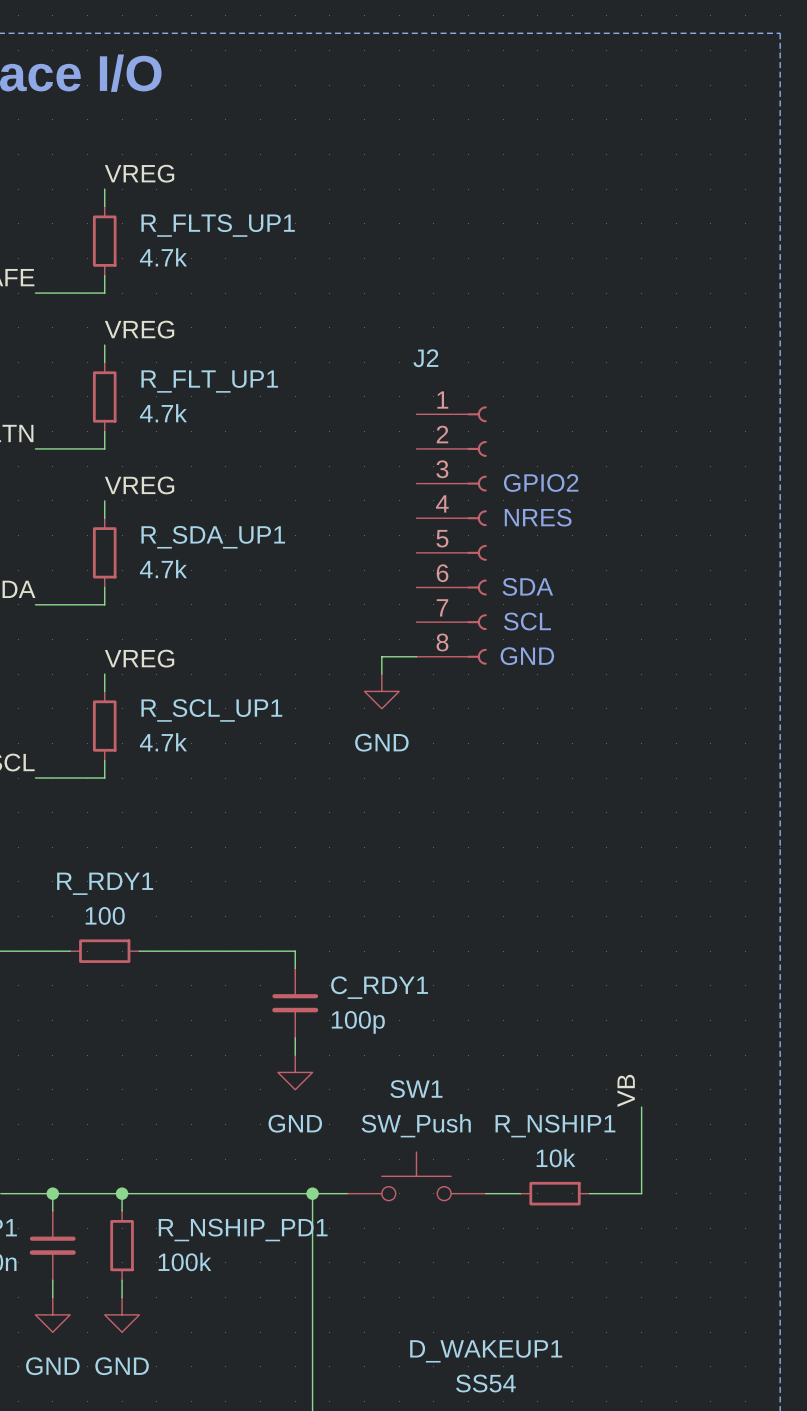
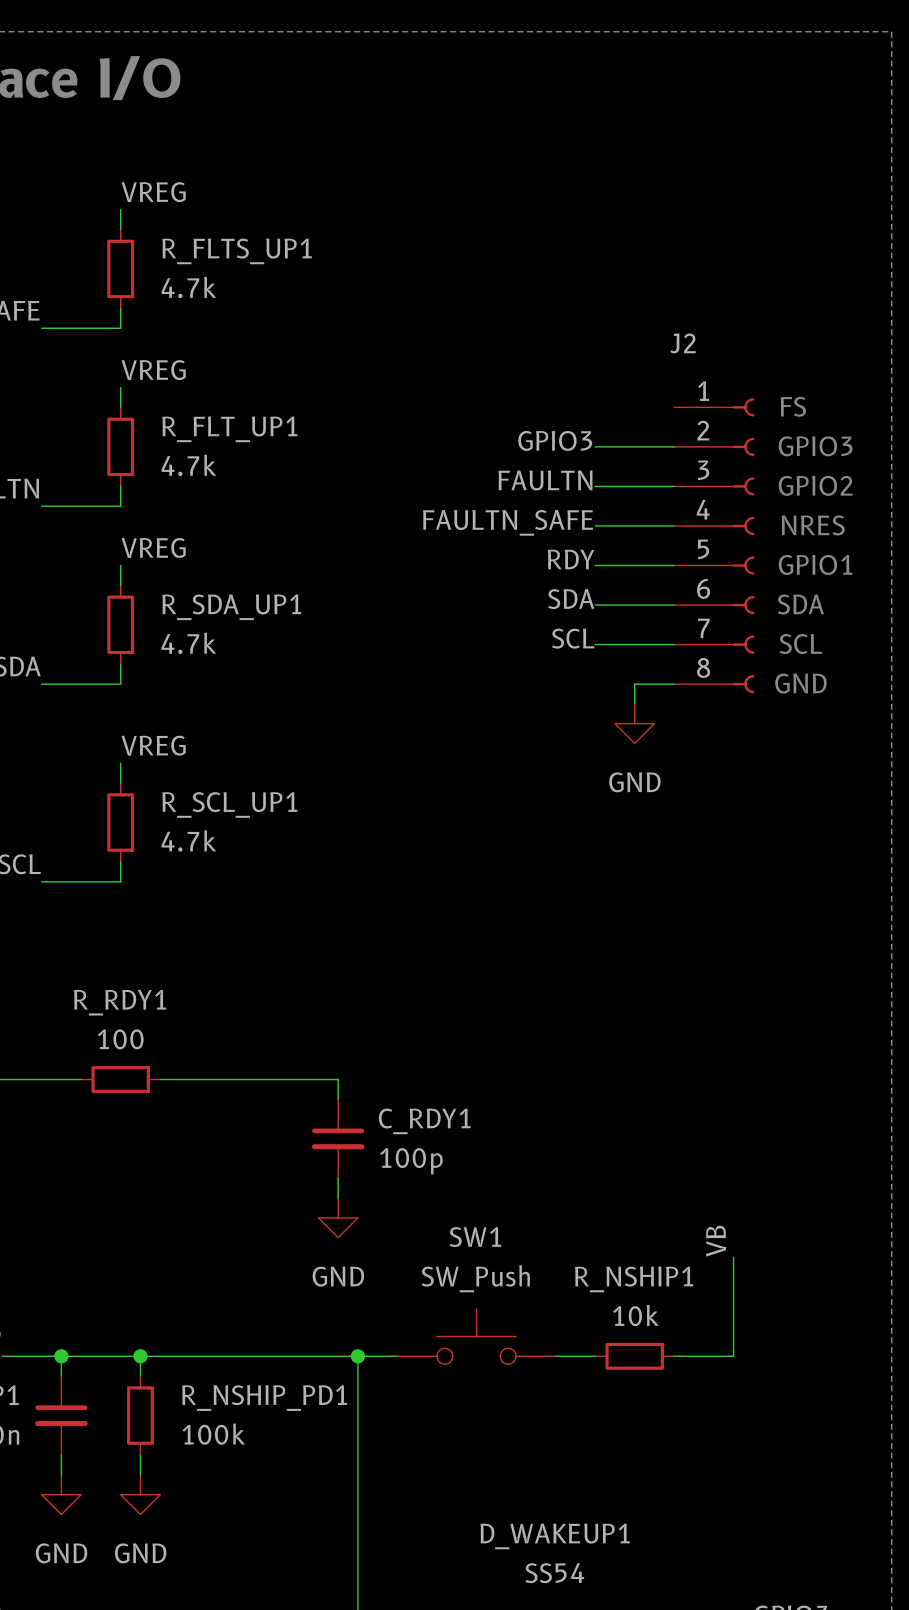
text: none -> FS (793, 406)
label: none -> GPIO3 (555, 440)
wire: none -> (595, 446) (674, 446)
text: none -> GPIO3 (815, 446)
label: none -> FAULTN (545, 480)
wire: none -> (595, 486) (674, 486)
label: none -> FAULTN_SAFE (508, 522)
wire: none -> (595, 525) (674, 525)
text position: GPIO2 (541, 482) -> GPIO2 (815, 485)
label: none -> RDY (571, 559)
wire: none -> (595, 565) (674, 565)
text: none -> GPIO1 (815, 564)
text position: NRES (538, 517) -> NRES (813, 525)
label: none -> SDA (571, 599)
J2 position: (451, 535) -> (714, 545)
wire: none -> (595, 605) (674, 605)
label: none -> SCL (573, 638)
wire: none -> (595, 644) (674, 644)
text position: SDA (527, 586) -> SDA (800, 604)
text position: SCL (527, 621) -> SCL (800, 644)
wire: (416, 656) (381, 656) (381, 674) -> (674, 684) (634, 684) (634, 703)
text position: GND (527, 656) -> GND (800, 683)
power symbol position: GND (381, 691) -> GND (634, 723)

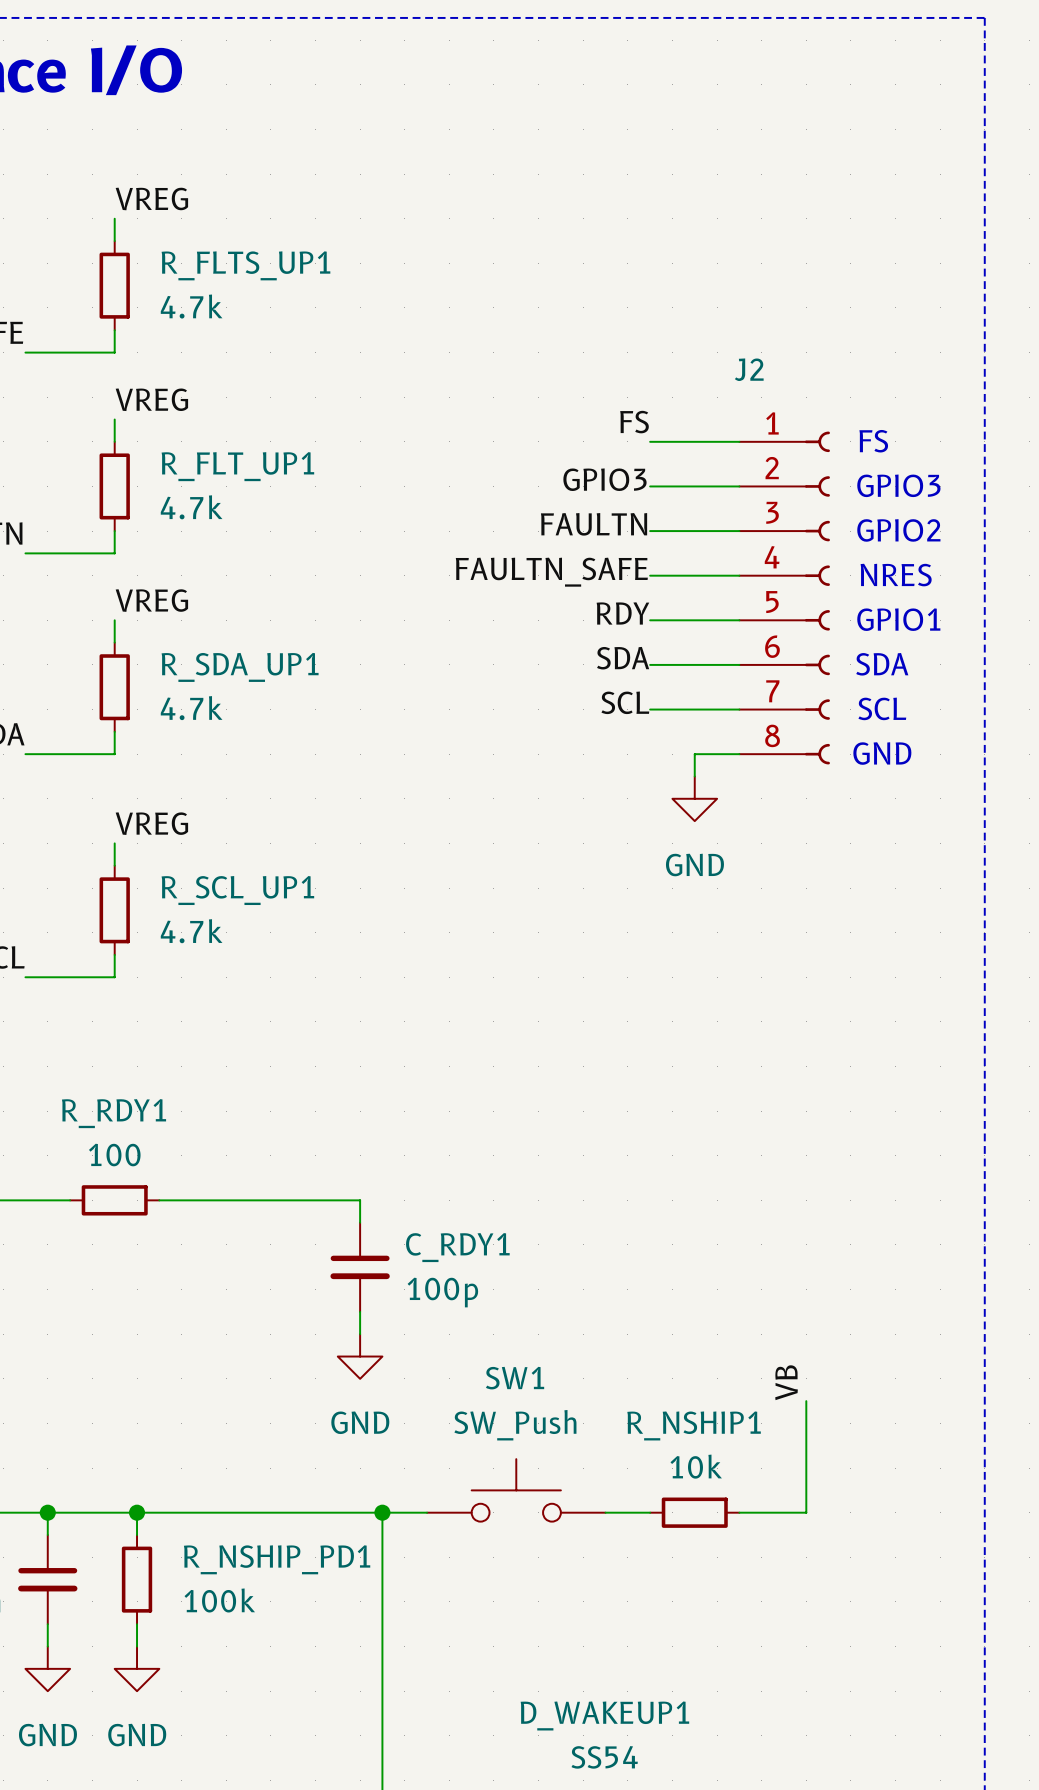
label: none -> FS (634, 422)
wire: none -> (650, 441) (739, 441)

